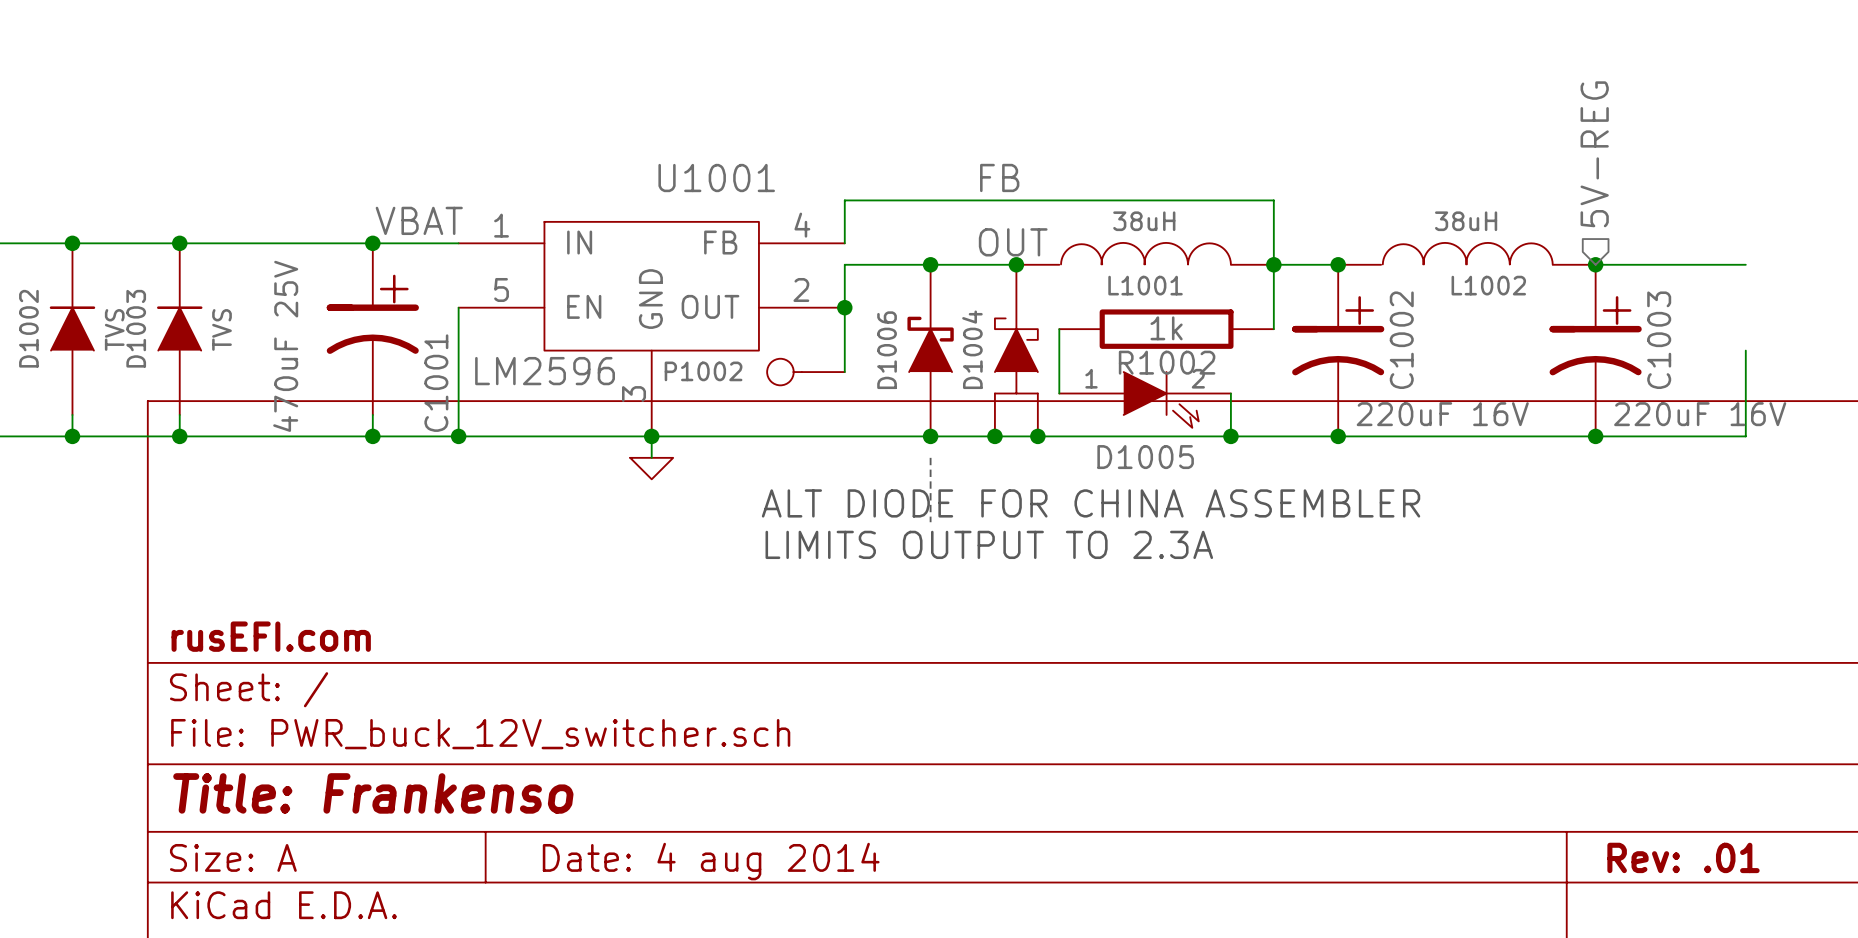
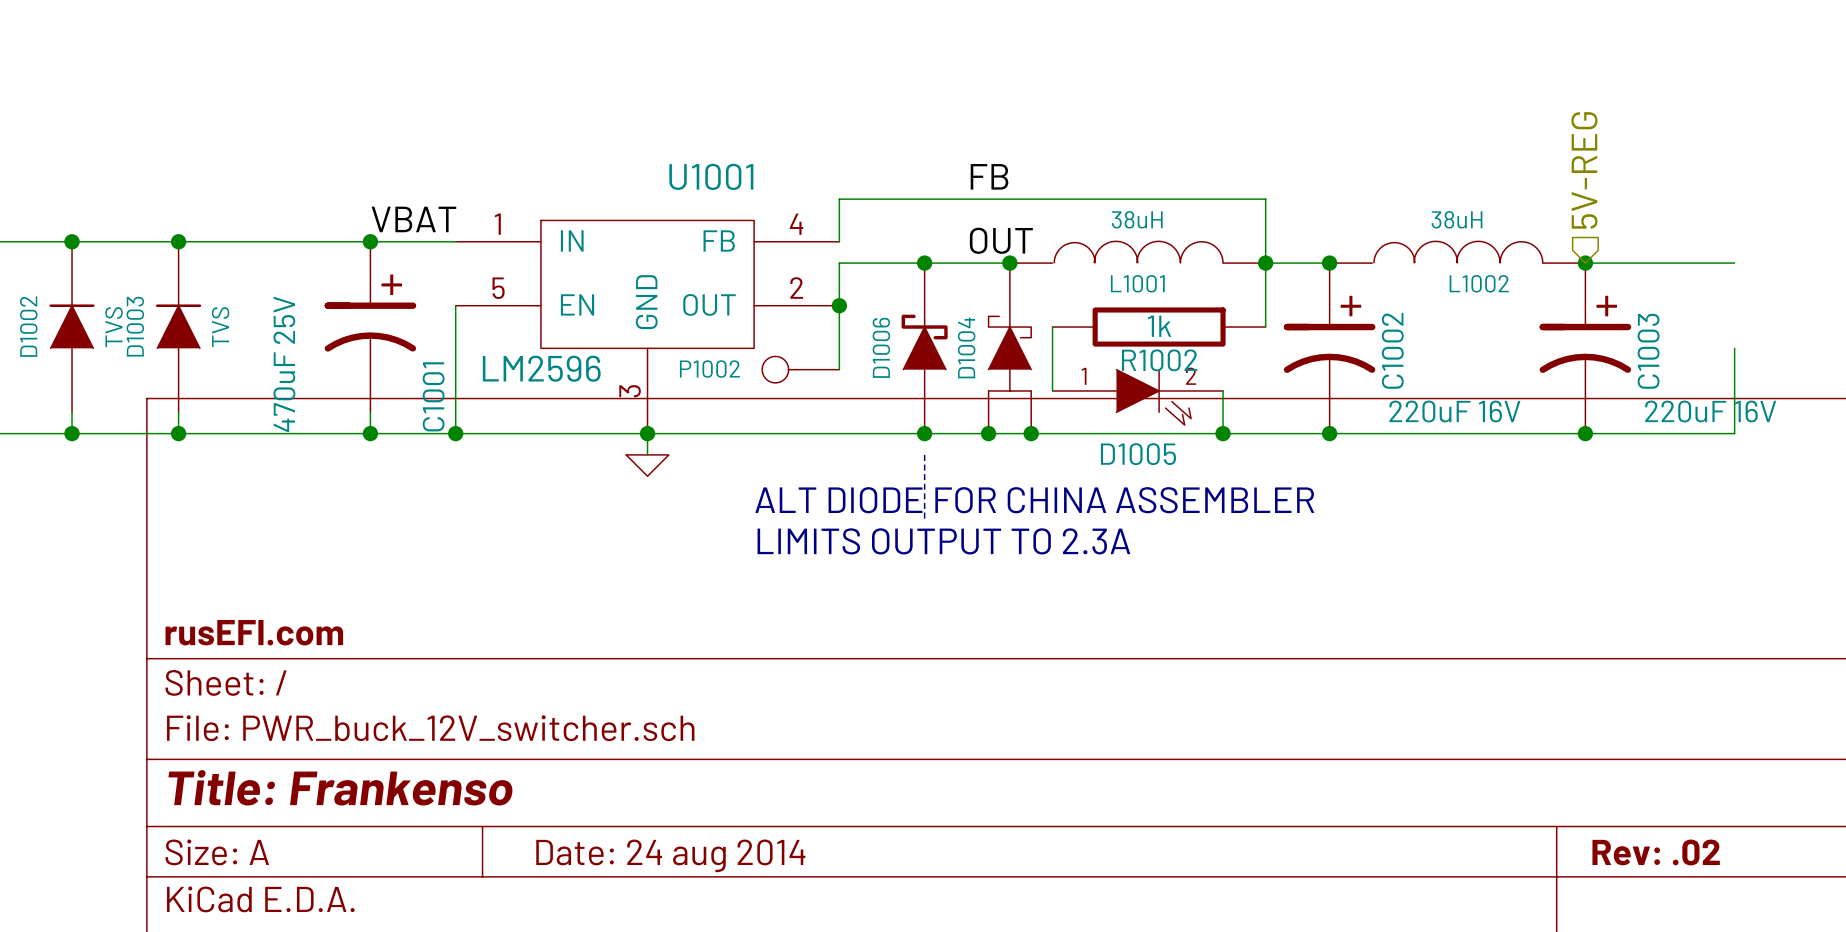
title block: Rev: .01 (1683, 857) -> Rev: .02 (1656, 852)
title block: Date: 4 aug 2014 (711, 861) -> Date: 24 aug 2014 (670, 855)

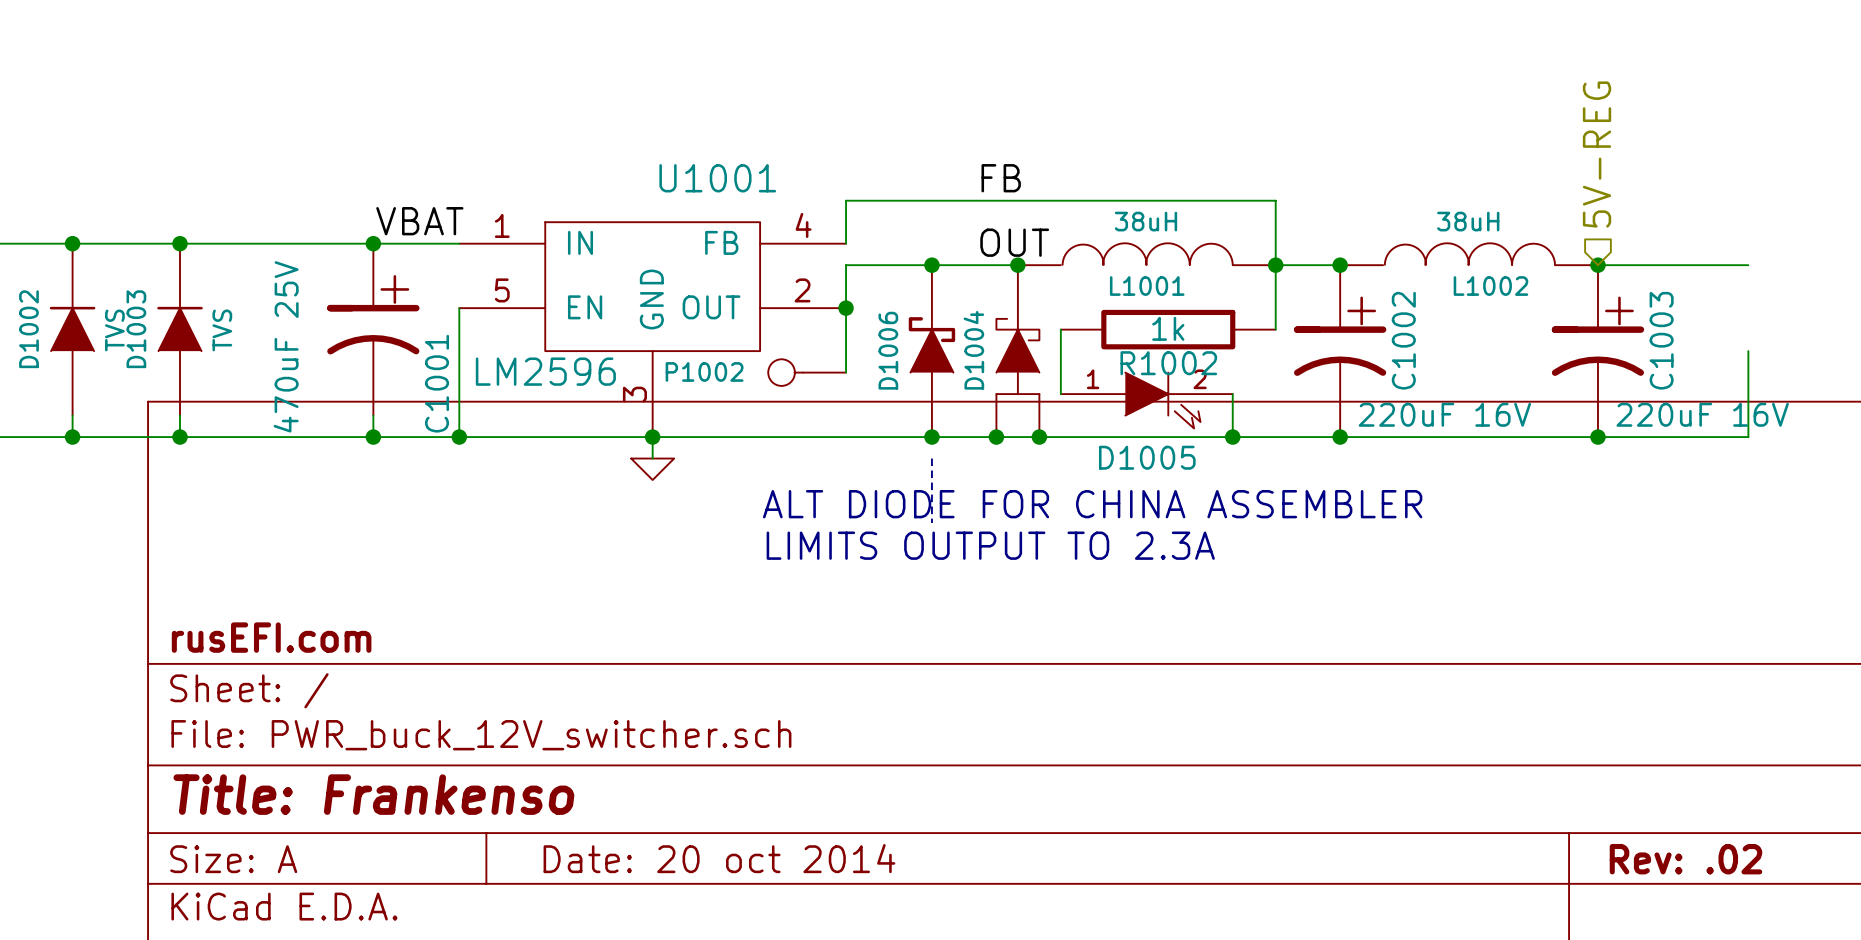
title block: Date: 24 aug 2014 (670, 855) -> Date: 20 oct 2014 (719, 858)

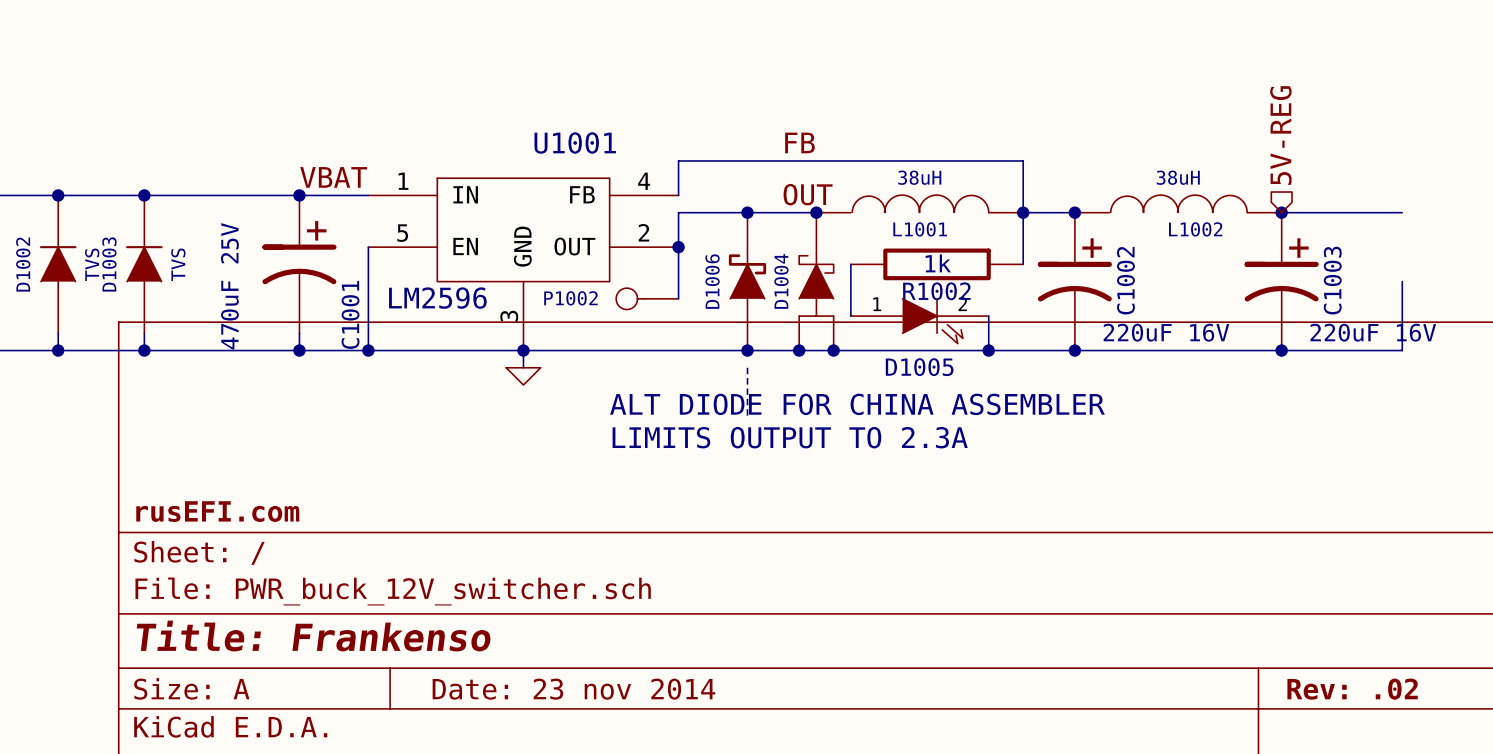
title block: Date: 20 oct 2014 (719, 858) -> Date: 23 nov 2014 (573, 689)

